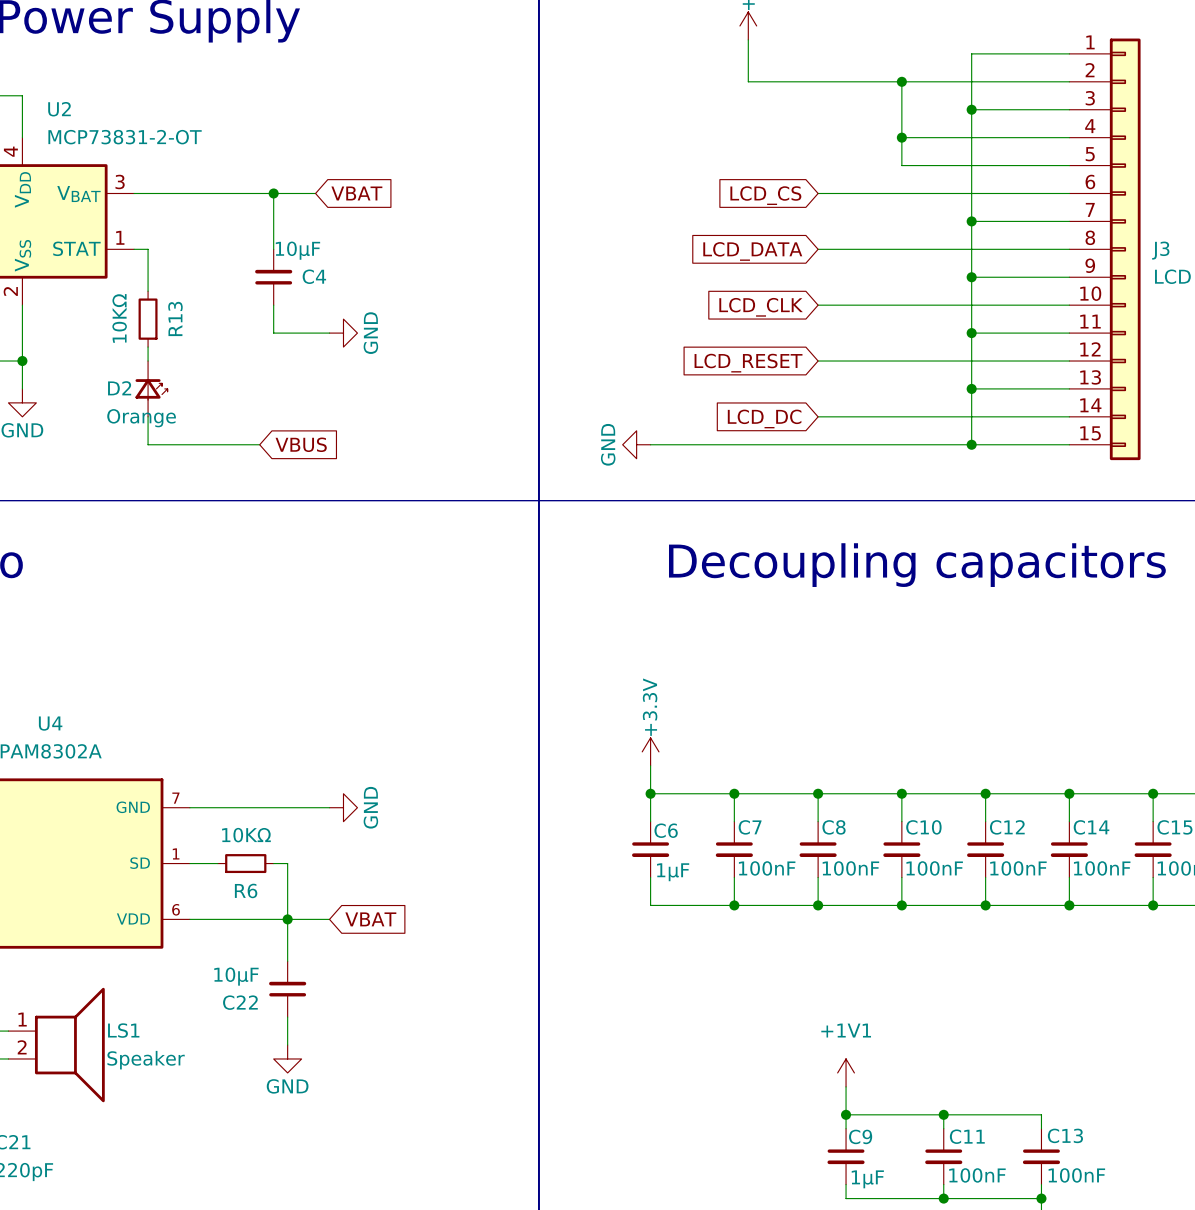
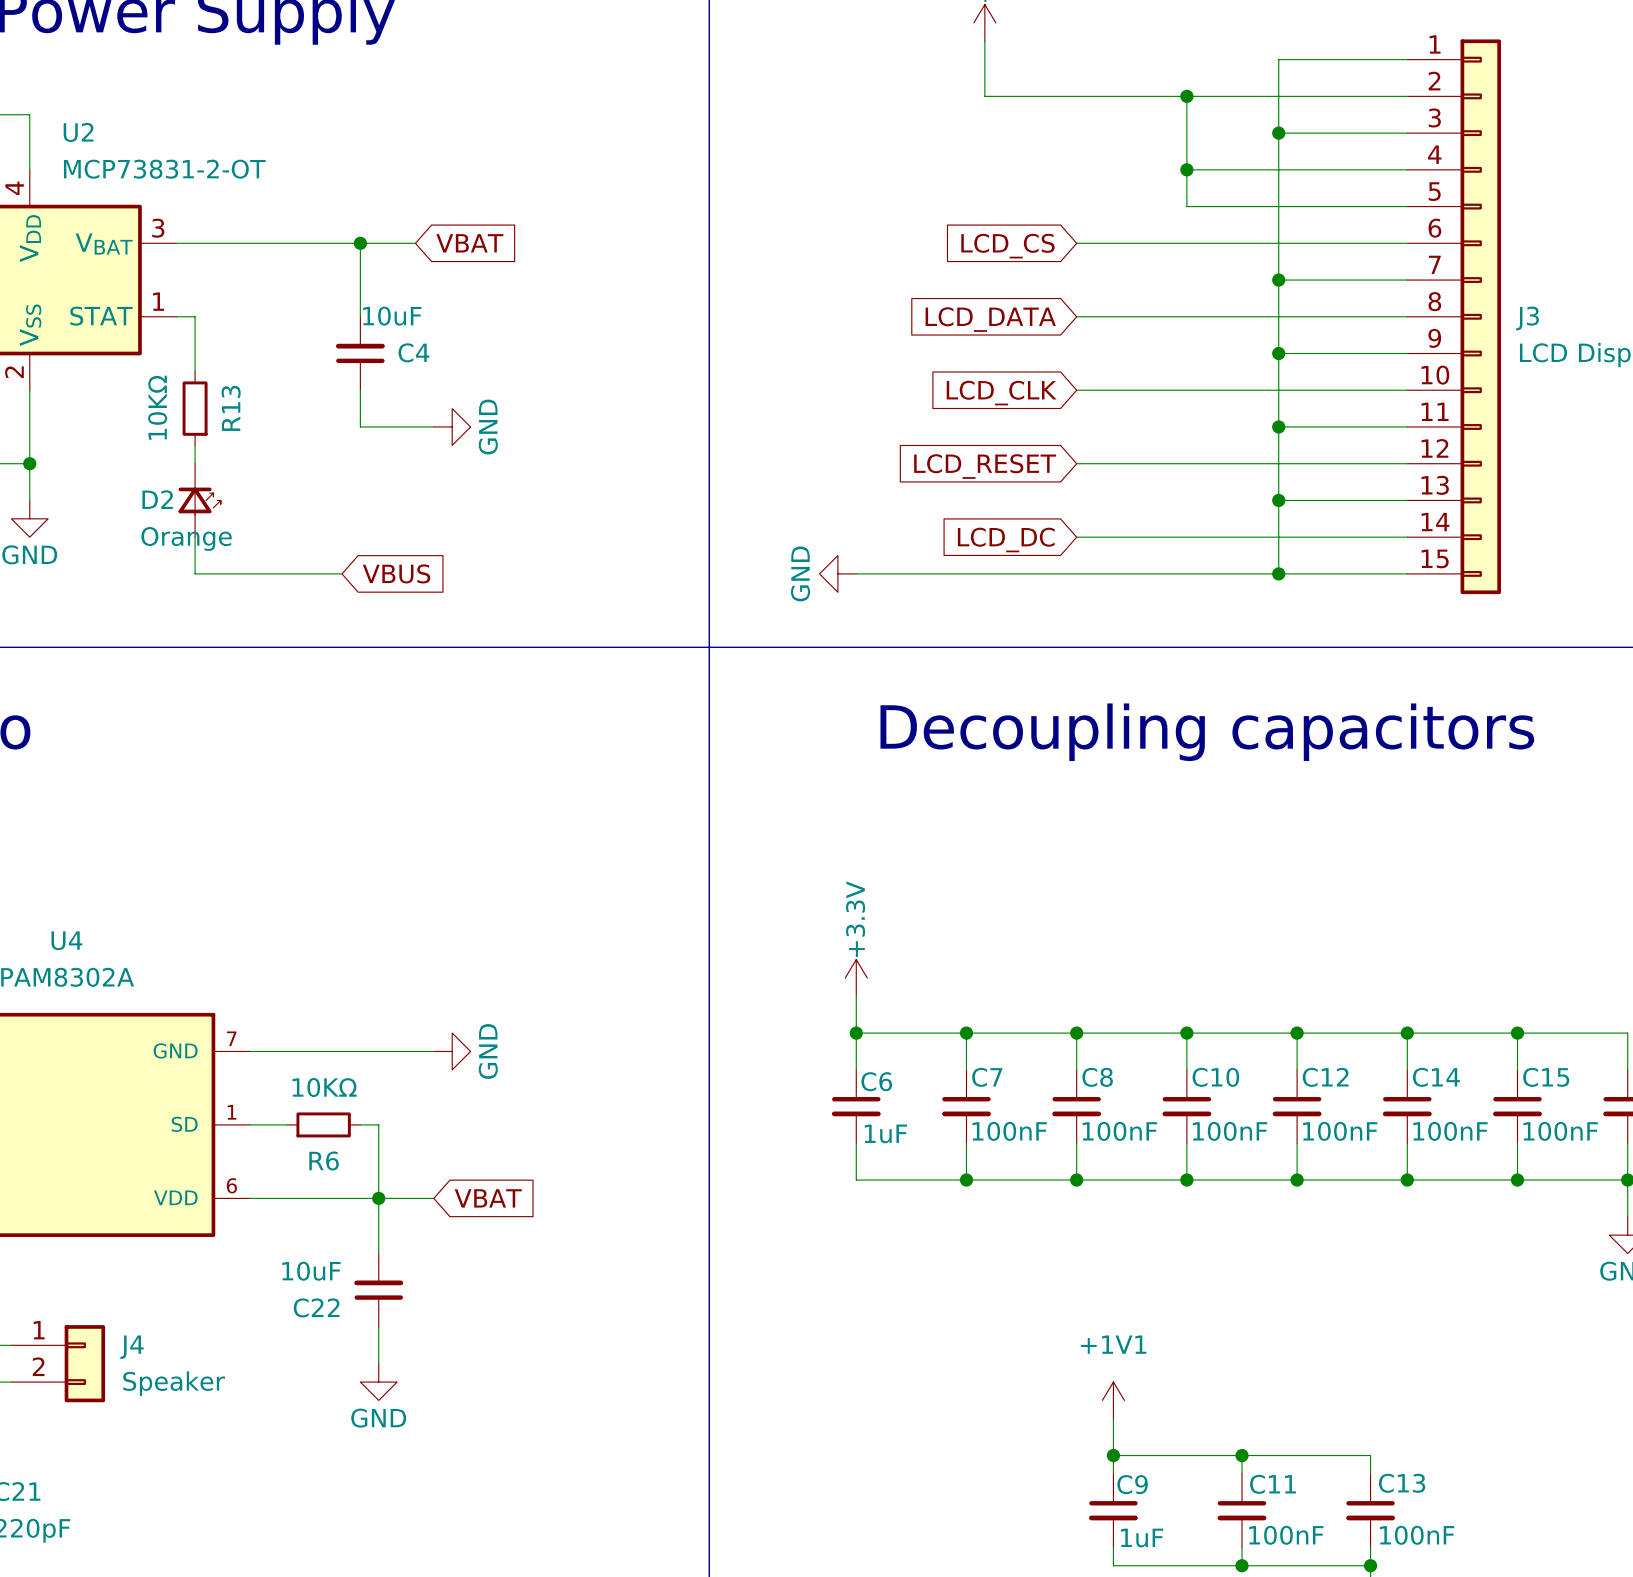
C4 value: 10μF (297, 250) -> 10uF (392, 316)
C6 value: 1μF (673, 872) -> 1uF (885, 1133)
C22 value: 10μF (236, 976) -> 10uF (311, 1271)
J4: none -> Speaker (58, 1363)
LS1: Speaker (56, 1045) -> none
C9 value: 1μF (867, 1179) -> 1uF (1142, 1537)

